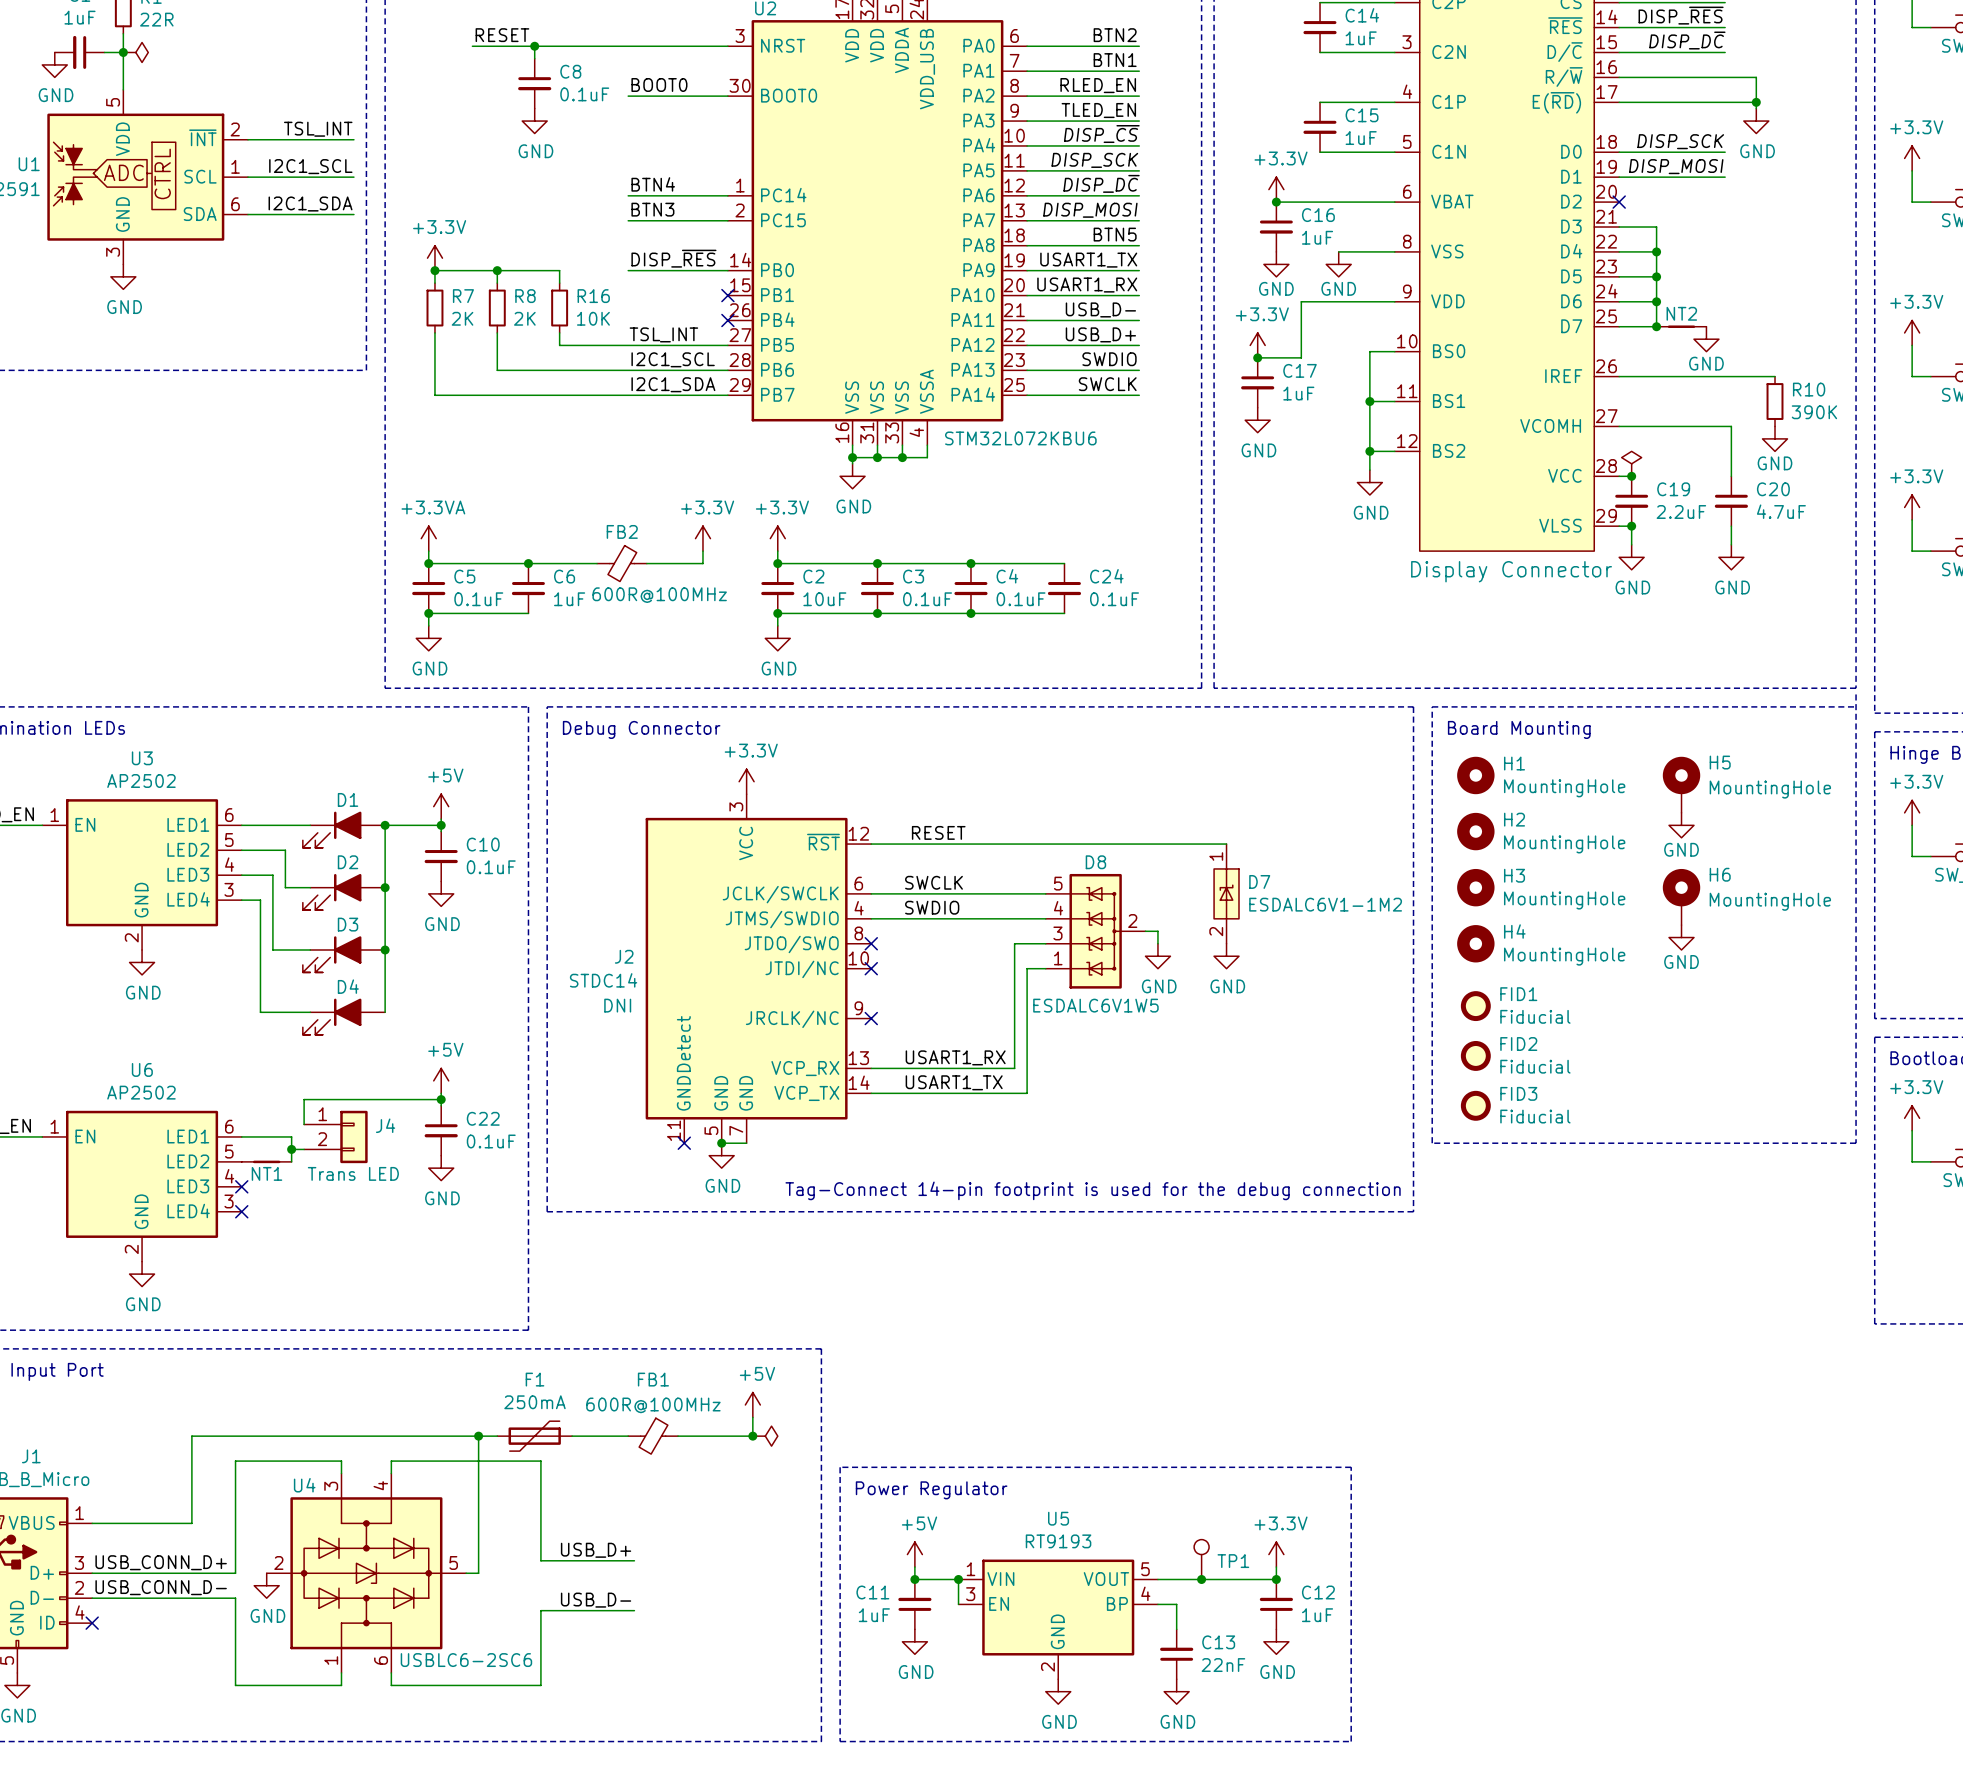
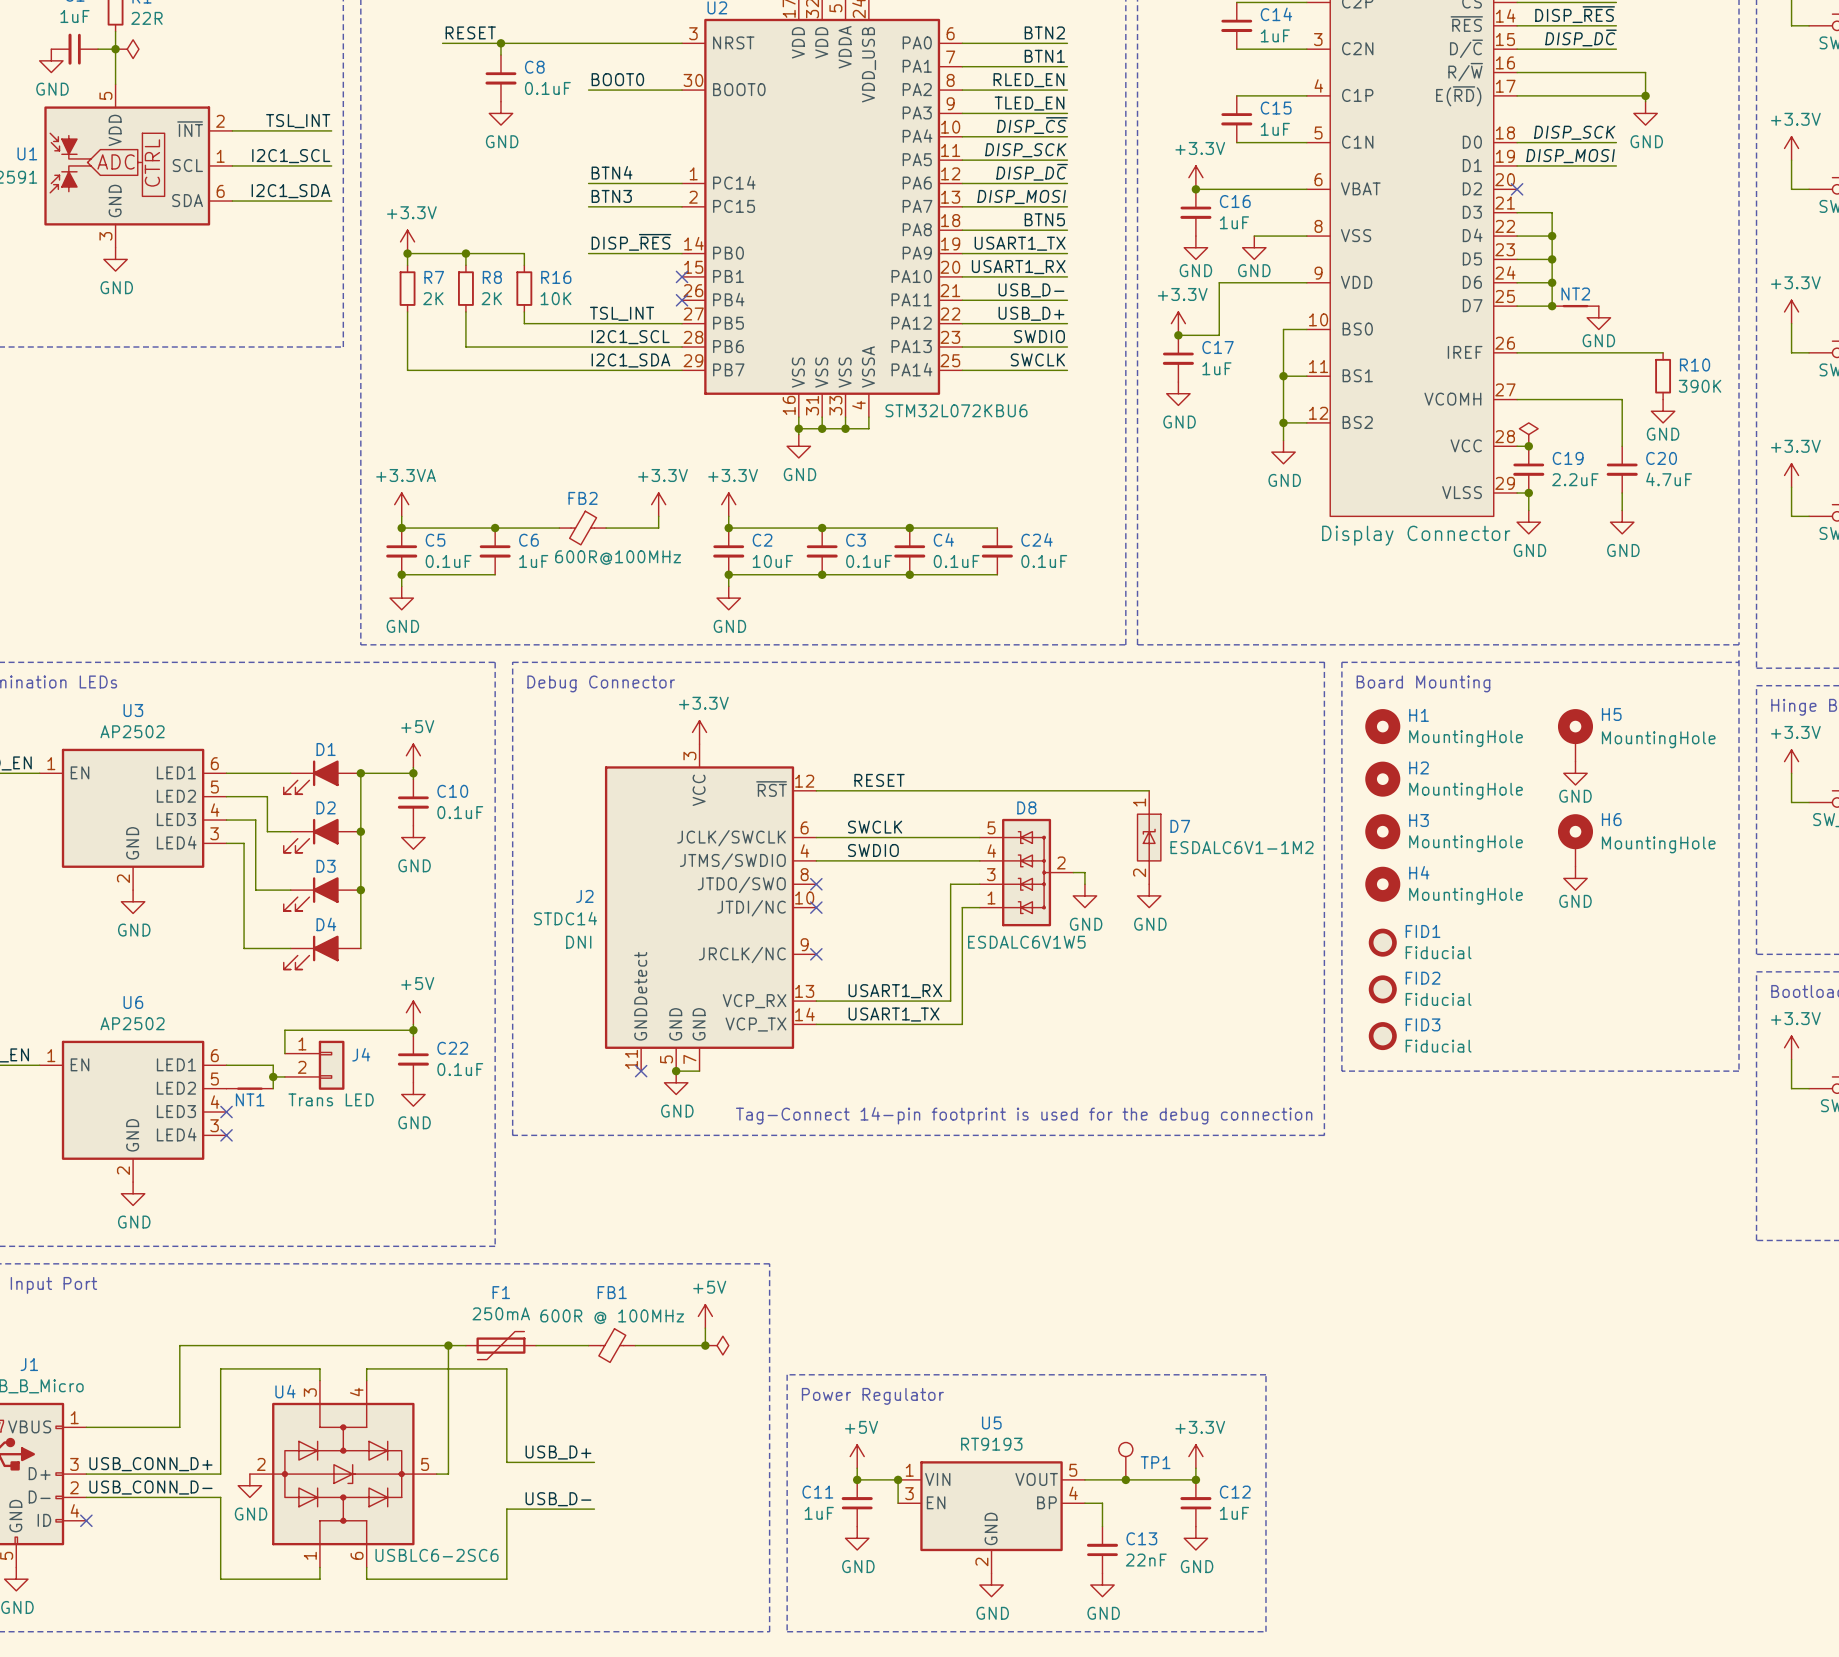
FB1 value: 600R@100MHz (653, 1405) -> 600R @ 100MHz (612, 1316)

